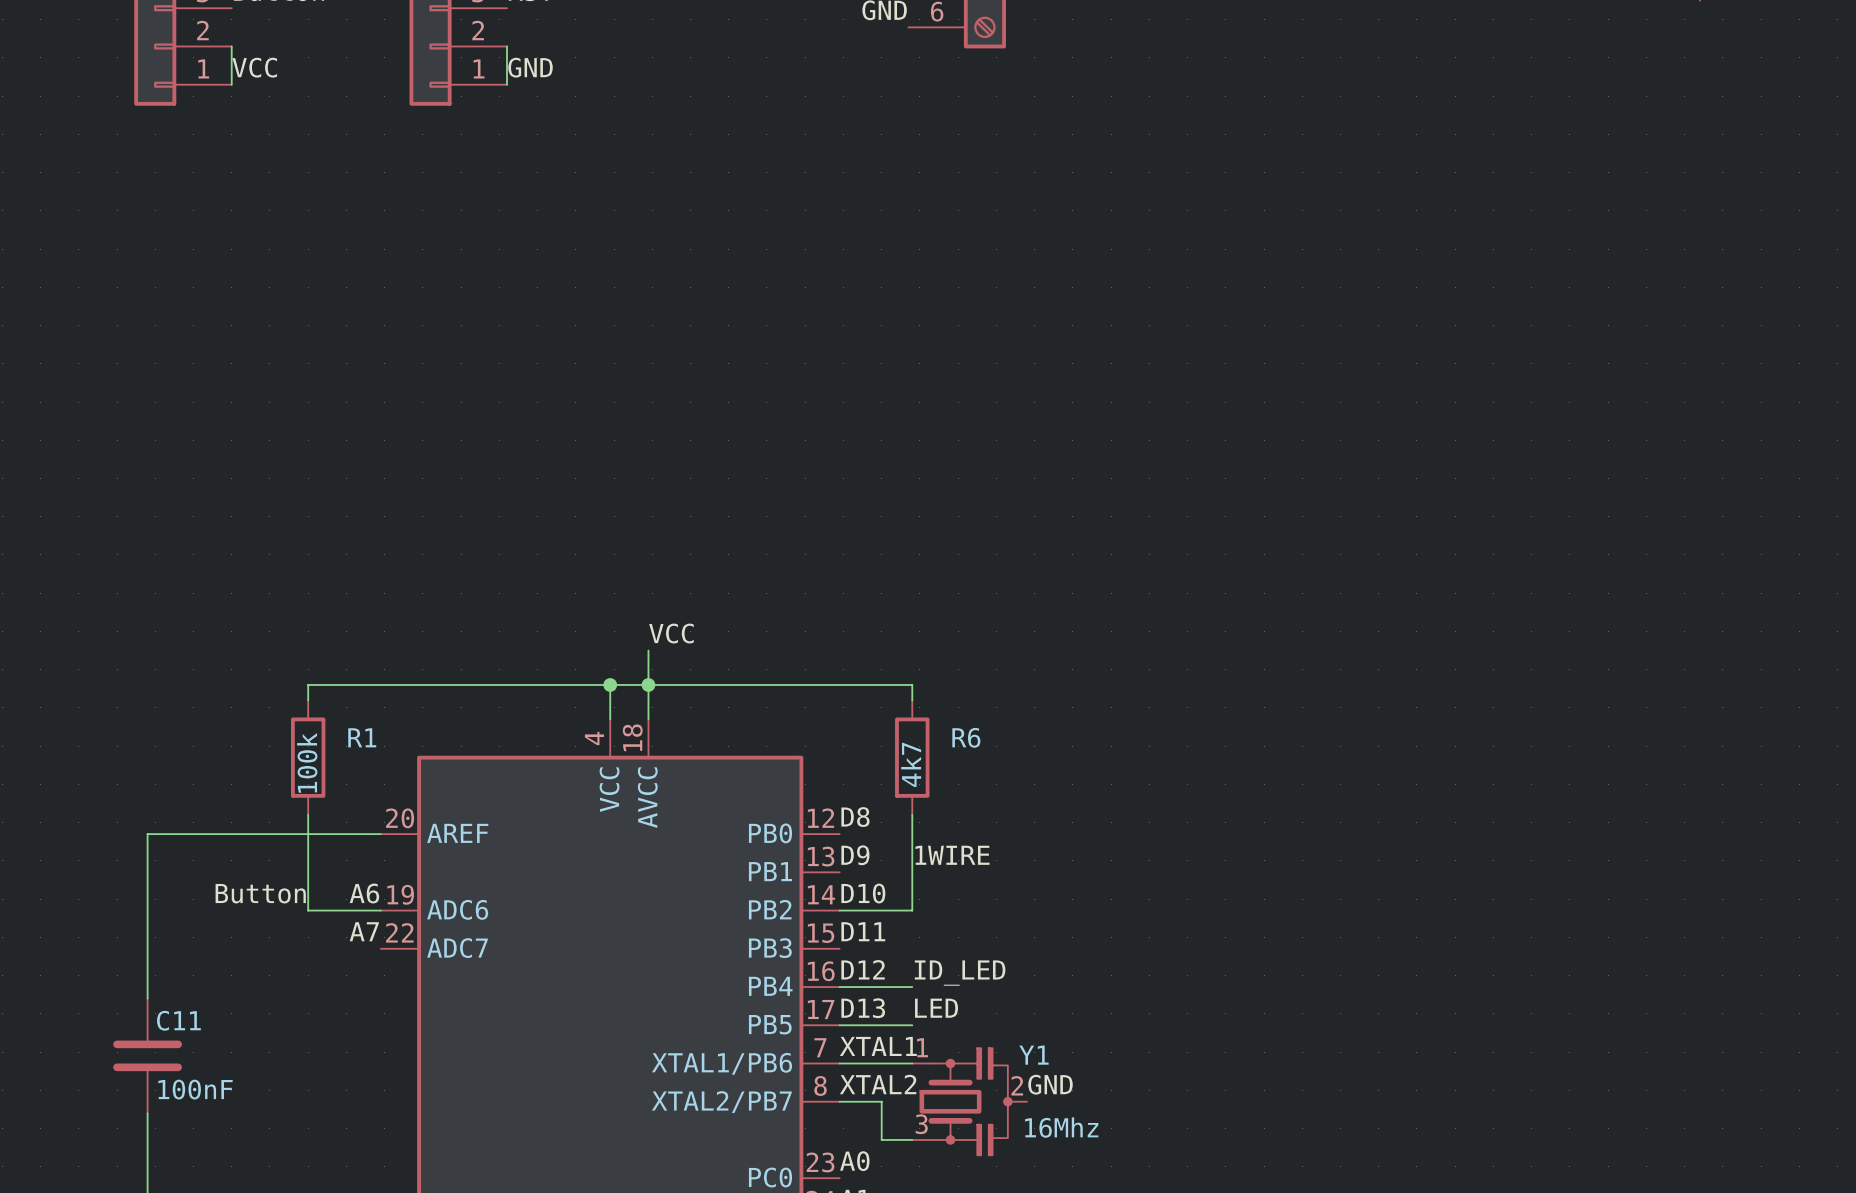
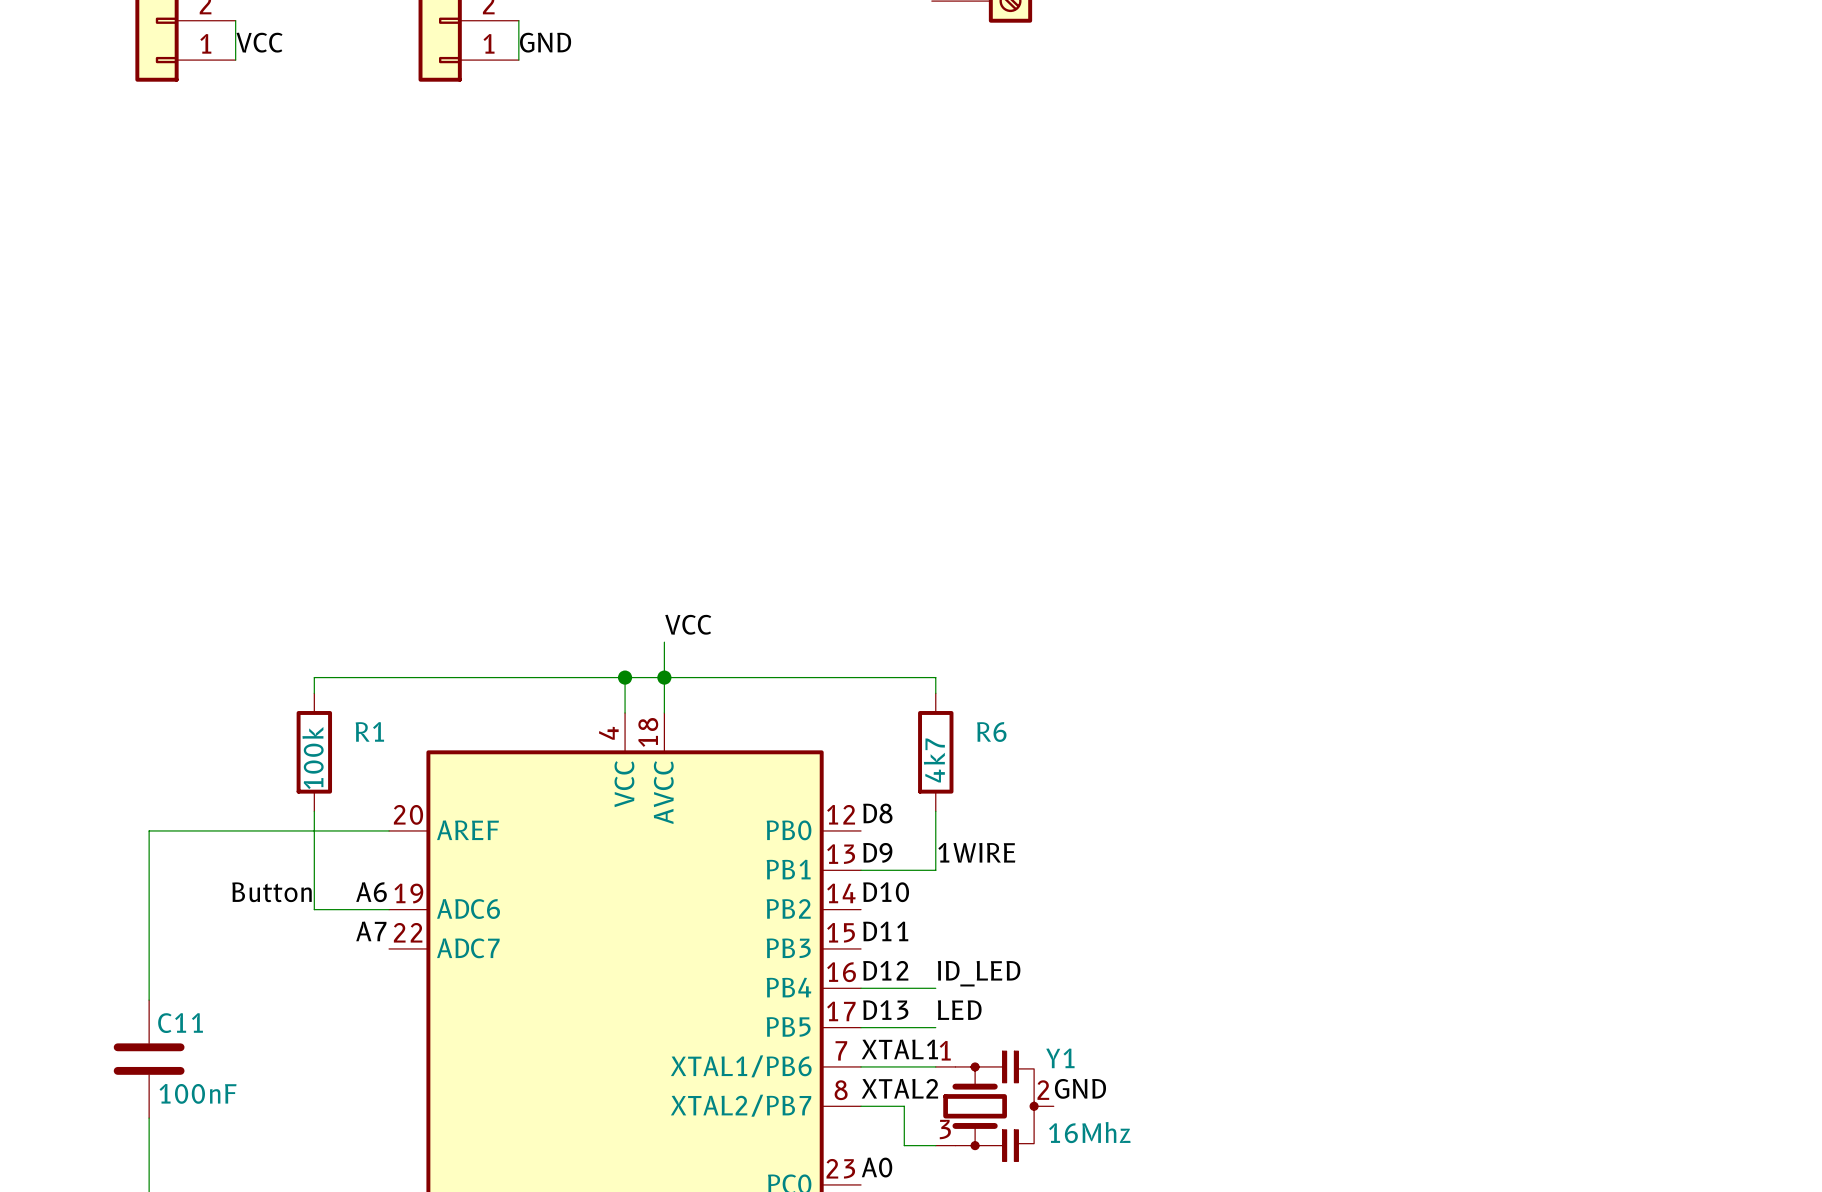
wire: (912, 872) (912, 910) (839, 910) -> (935, 870) (861, 870)

